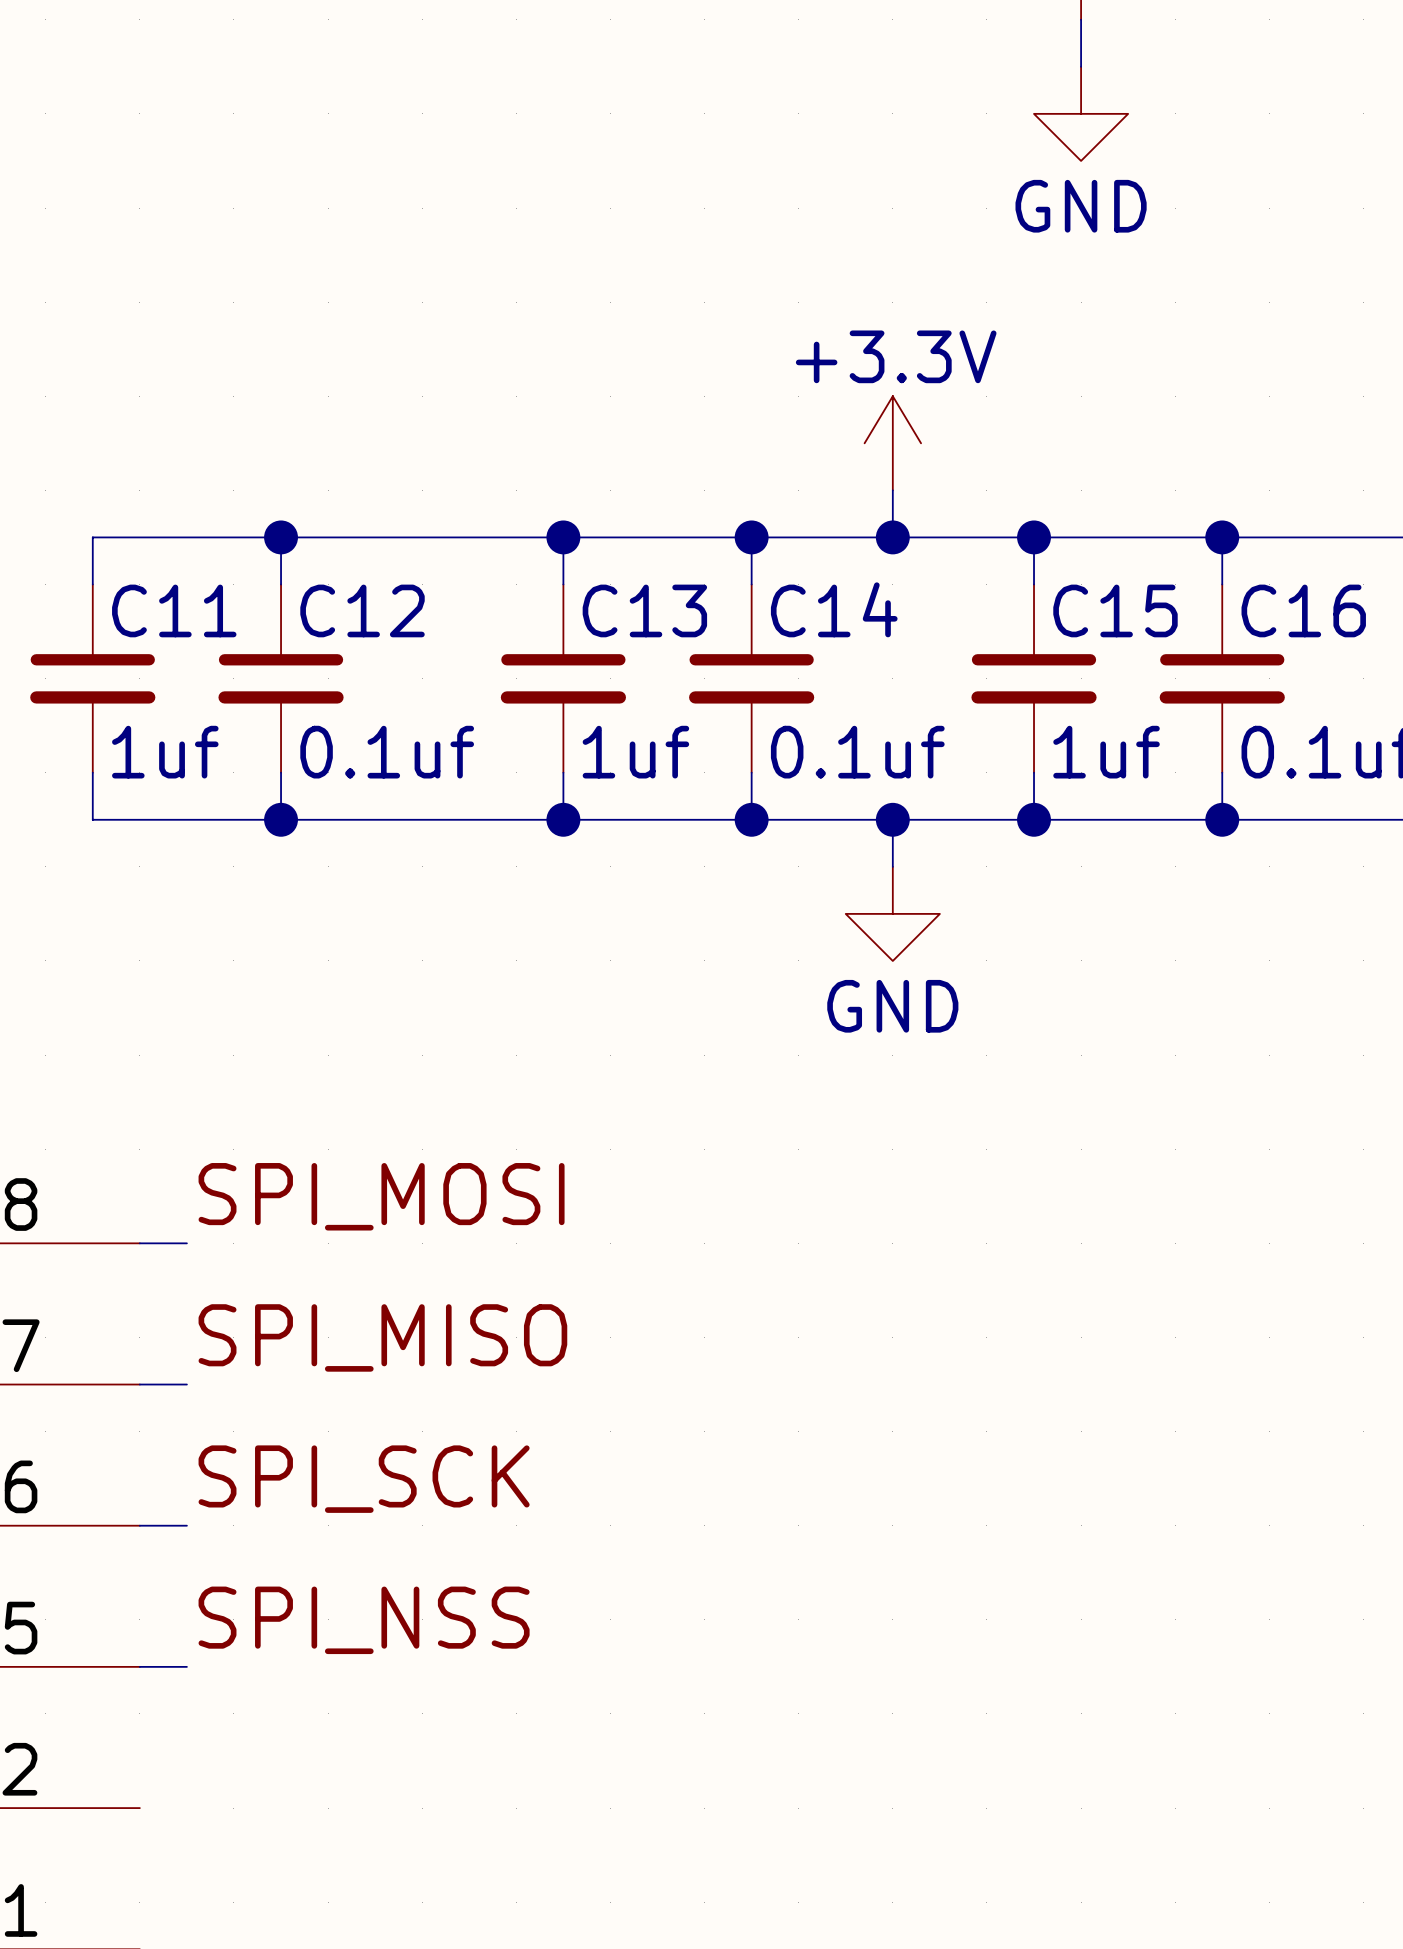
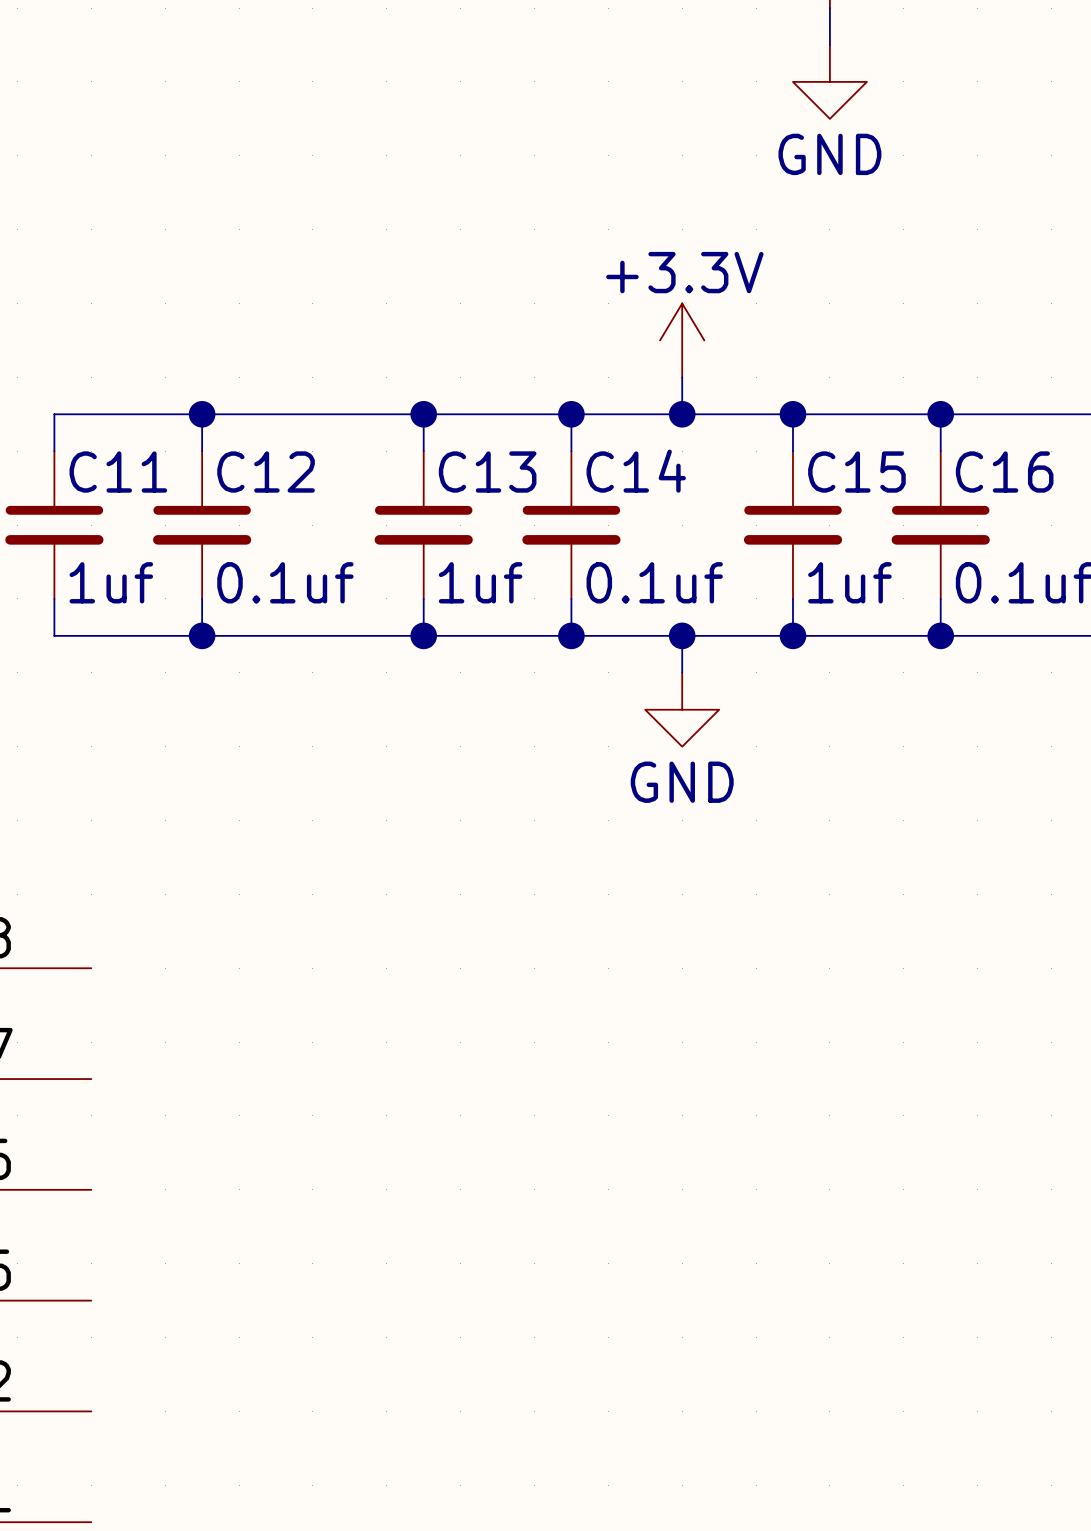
label: SPI_MOSI (381, 1196) -> none
wire: (139, 1243) (186, 1243) -> none
label: SPI_MISO (382, 1337) -> none
wire: (139, 1384) (186, 1384) -> none
label: SPI_SCK (364, 1479) -> none
wire: (139, 1525) (186, 1525) -> none
label: SPI_NSS (364, 1620) -> none
wire: (139, 1666) (186, 1666) -> none

